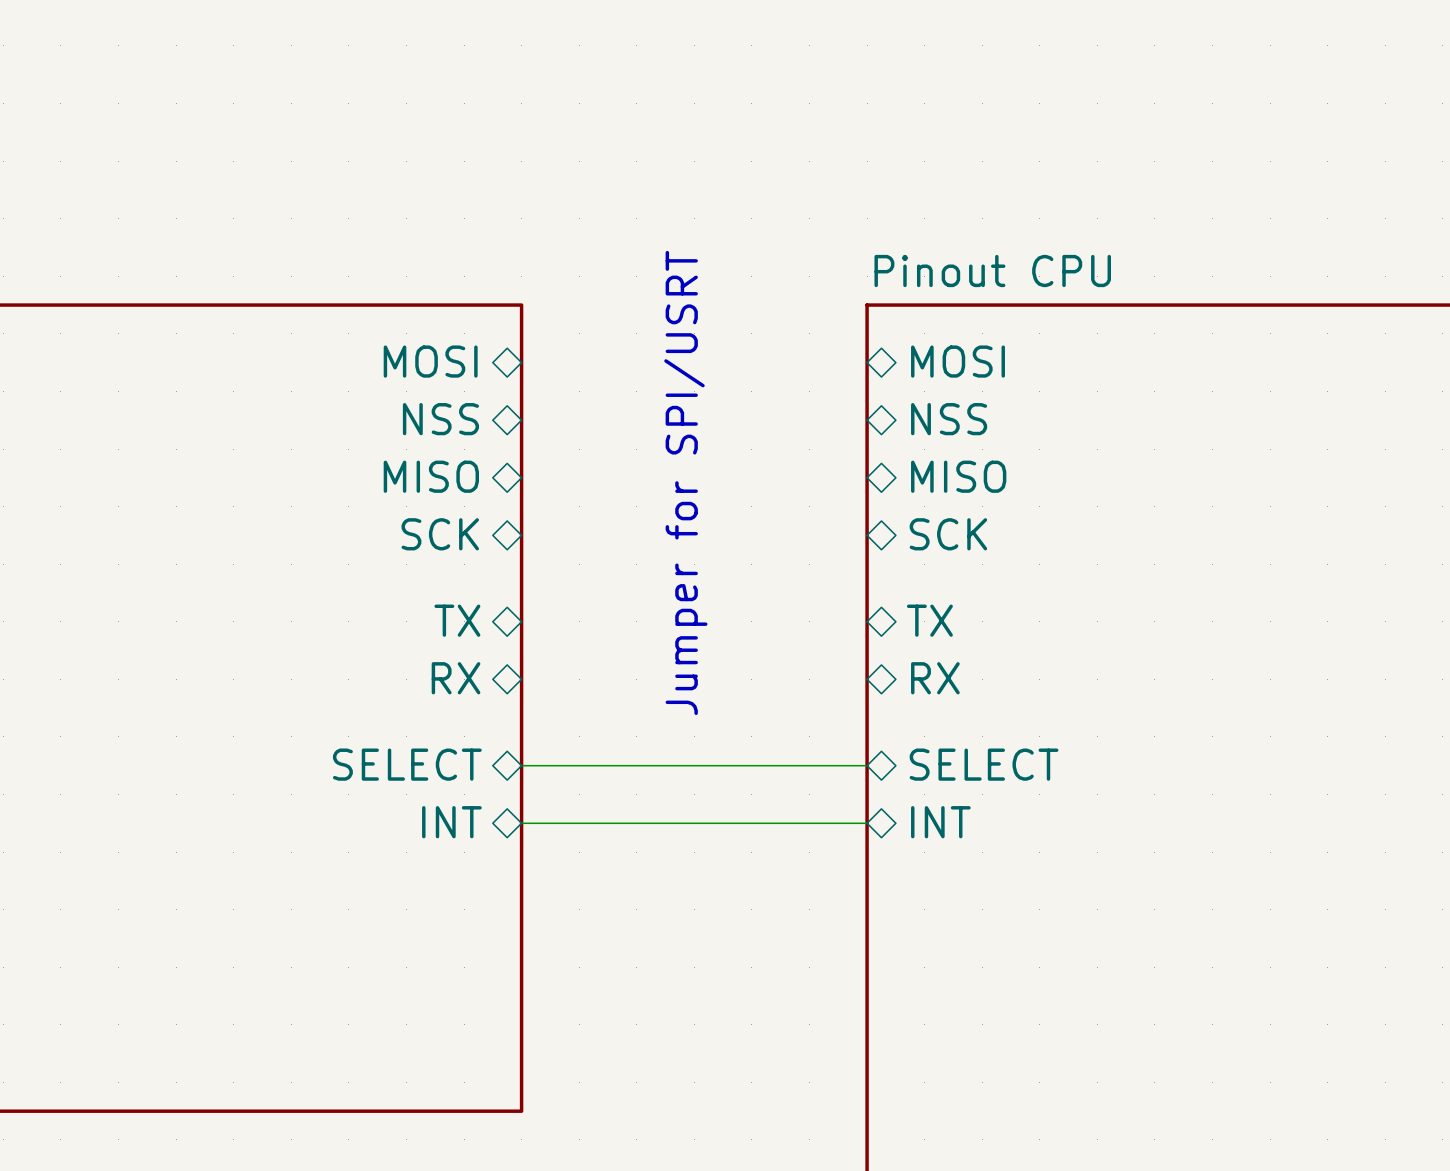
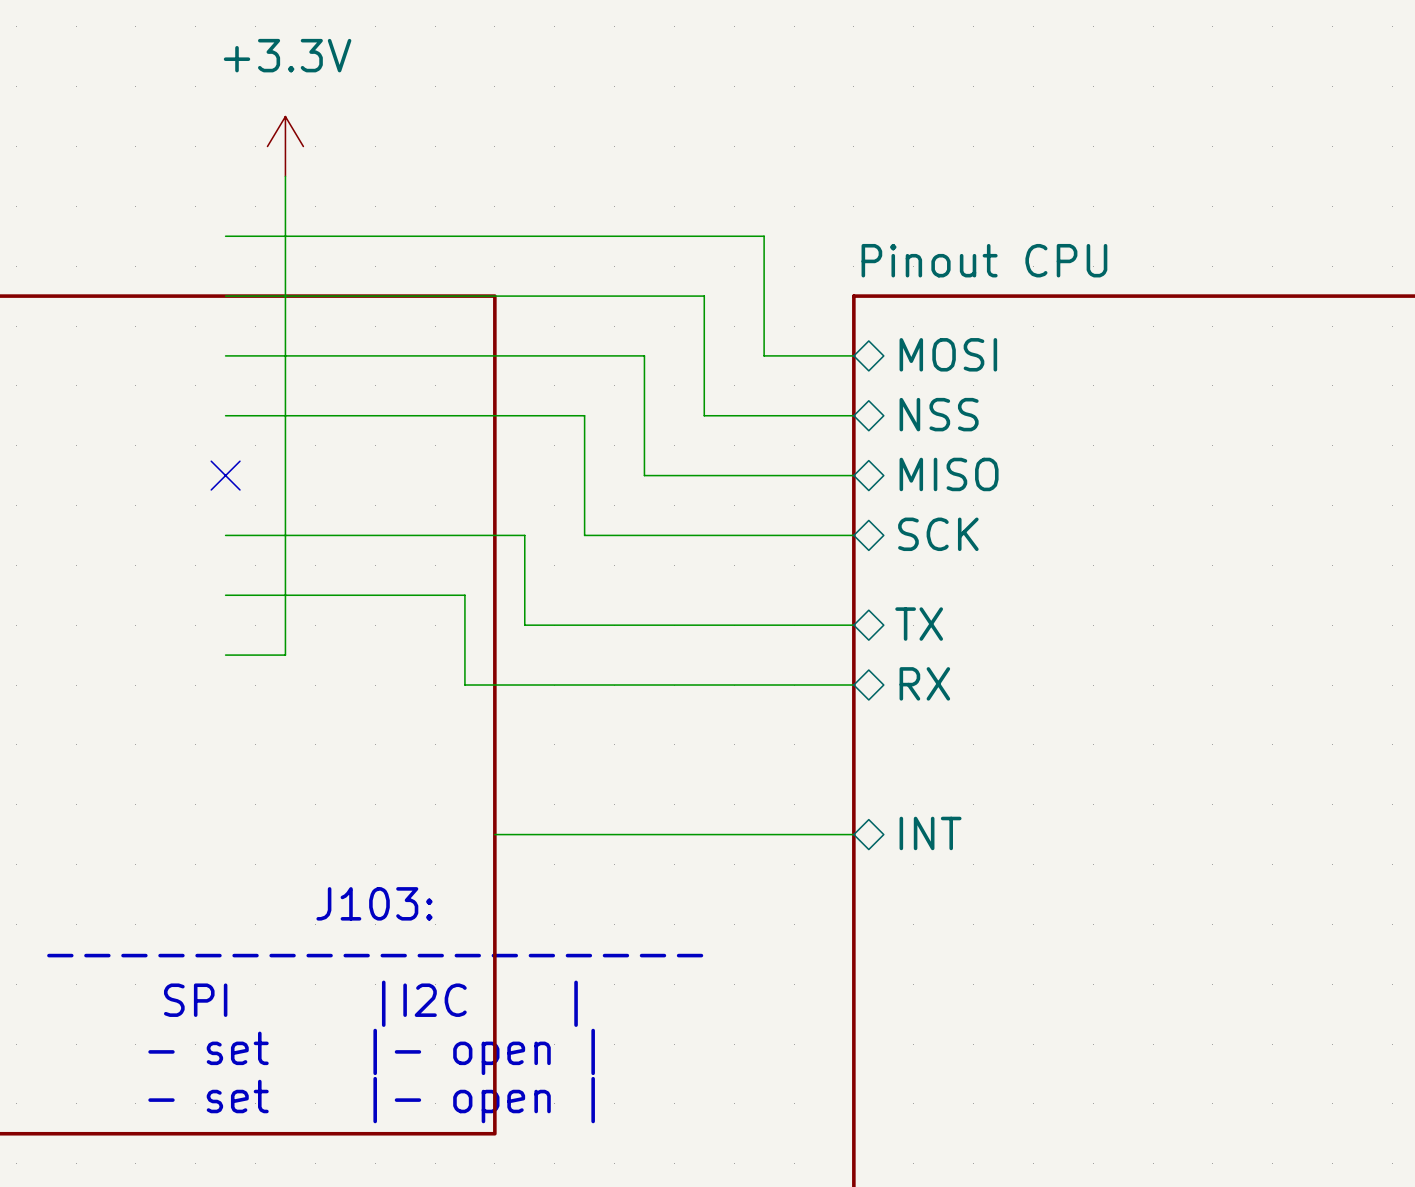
power symbol: none -> +3.3V (285, 146)
wire: none -> (285, 176) (285, 655) (225, 655)
wire: none -> (225, 236) (764, 236) (764, 355) (853, 355)
wire: none -> (225, 296) (704, 296) (704, 415) (853, 415)
sheet pin: MOSI (430, 361) -> none
wire: none -> (225, 355) (644, 355) (644, 475) (853, 475)
sheet pin: NSS (440, 419) -> none
wire: none -> (225, 415) (584, 415) (584, 535) (853, 535)
sheet pin: MISO (431, 476) -> none
no-connect mark: none -> (225, 475)
text: Jumper for SPI/USRT (685, 482) -> none
sheet pin: SCK (440, 534) -> none
wire: none -> (225, 535) (524, 535) (524, 625) (853, 625)
wire: none -> (225, 595) (464, 595) (464, 685) (853, 685)
sheet pin: TX (457, 620) -> none
sheet pin: RX (456, 678) -> none
sheet pin: SELECT (407, 764) -> none
sheet pin: SELECT (984, 764) -> none
wire: (521, 765) (867, 765) -> none
sheet pin: INT (451, 822) -> none
text: none -> J103: (374, 903)
text: none -> ------------------ (375, 955)
text: none -> SPI |I2C | (370, 1003)
text: none -> - set |- open | (371, 1051)
text: none -> - set |- open | (371, 1100)

